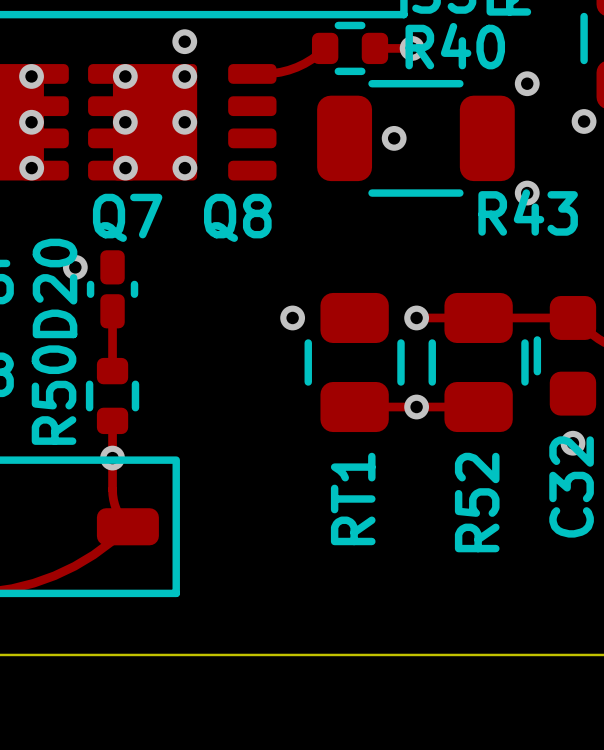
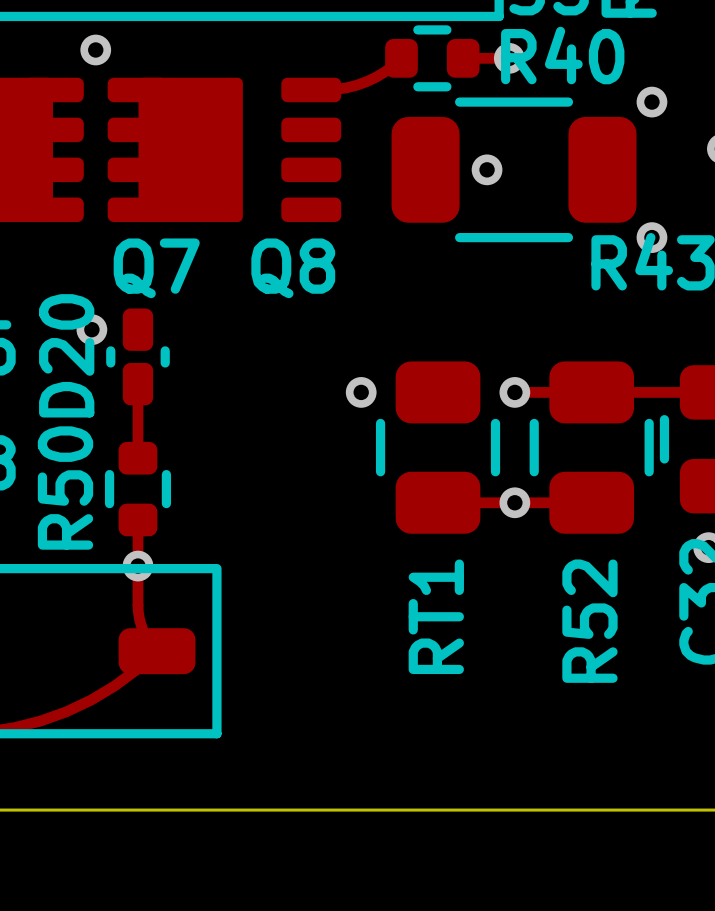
via: none -> (95, 49)
via: (184, 41) -> none
via: (31, 76) -> none
via: (125, 76) -> none
via: (184, 76) -> none
via: (31, 122) -> none
via: (125, 122) -> none
via: (184, 122) -> none
via: (31, 168) -> none
via: (125, 168) -> none
via: (184, 168) -> none

